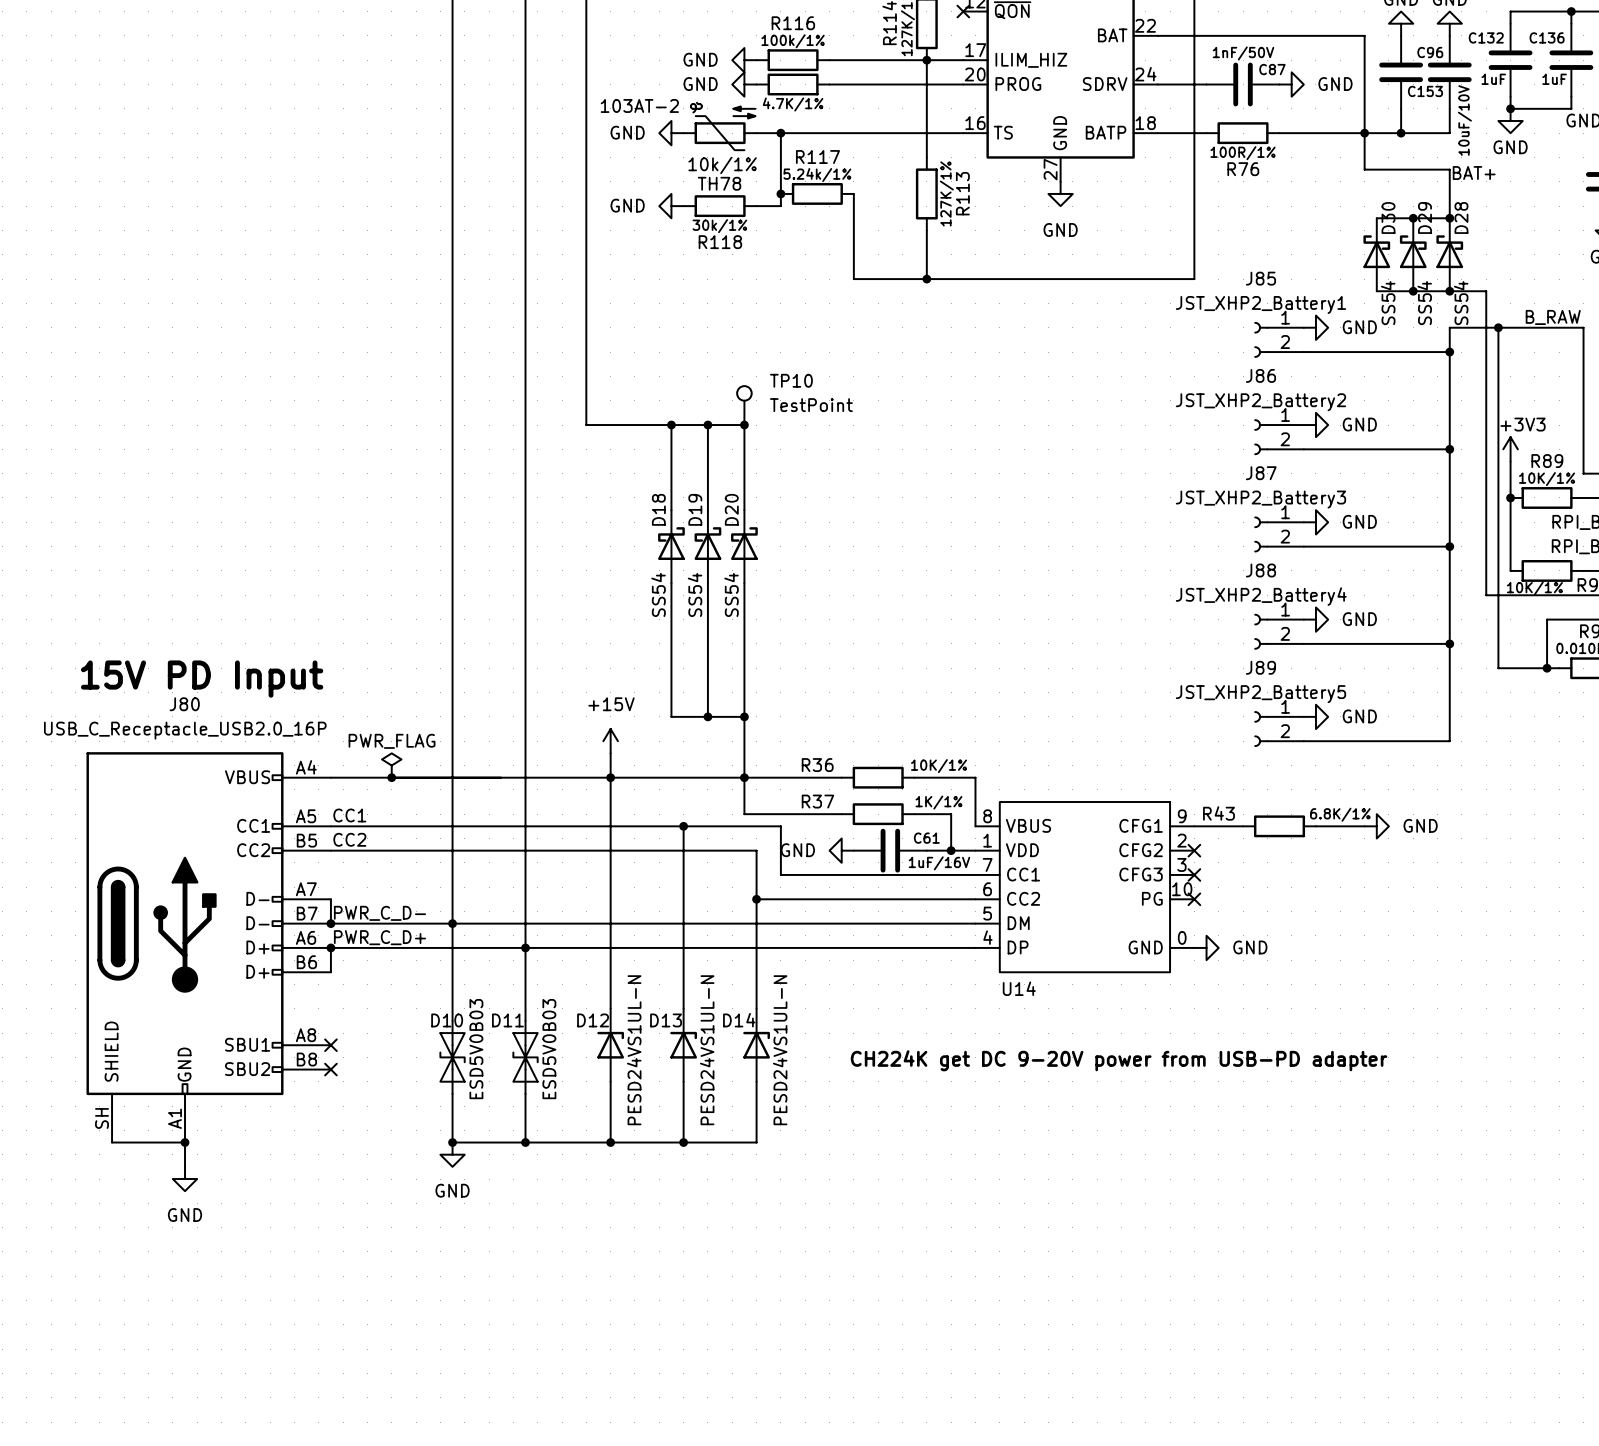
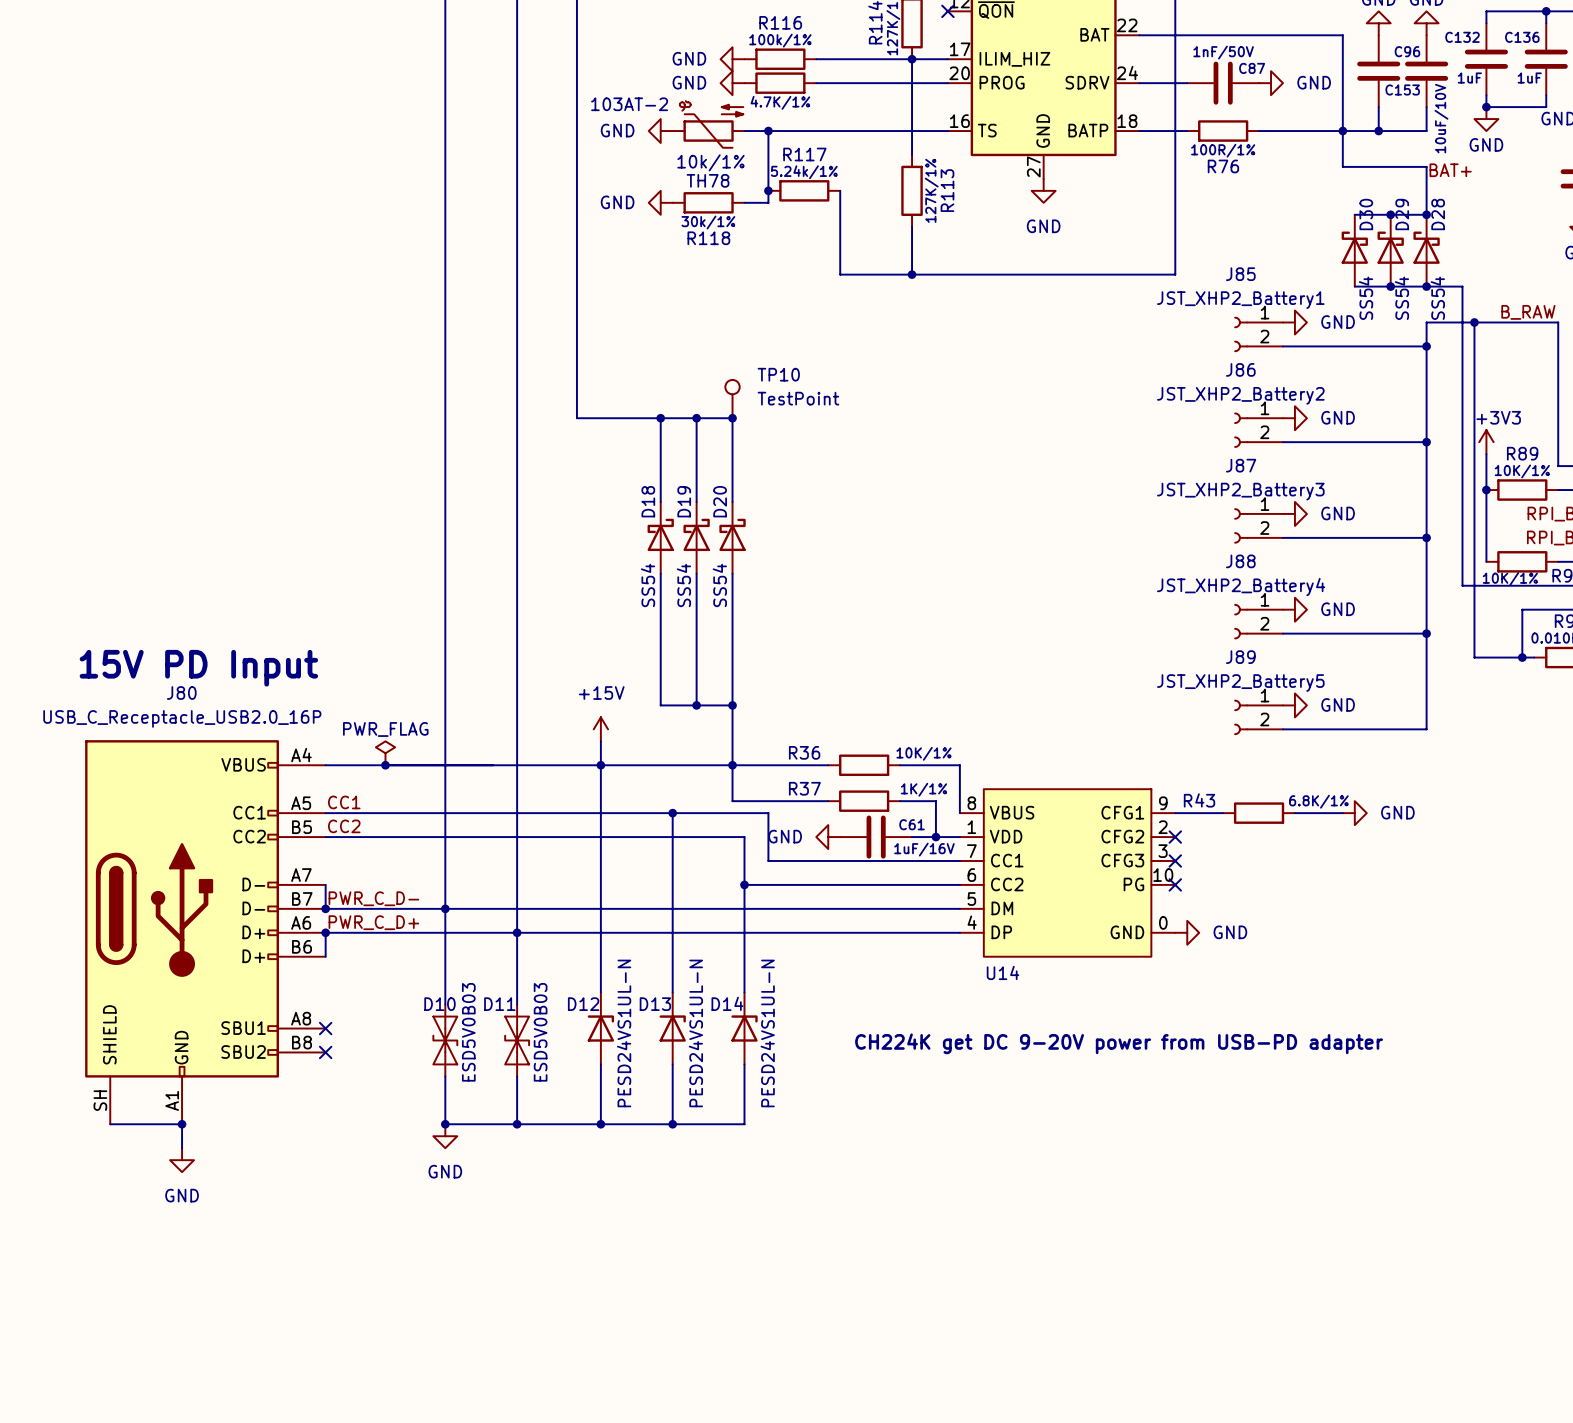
text: CH224K get DC 9-20V power from USB-PD adapter (1119, 1060) -> none
text: none -> CH224K get DC 9-20V power from USB-PD adapter (1119, 1043)

